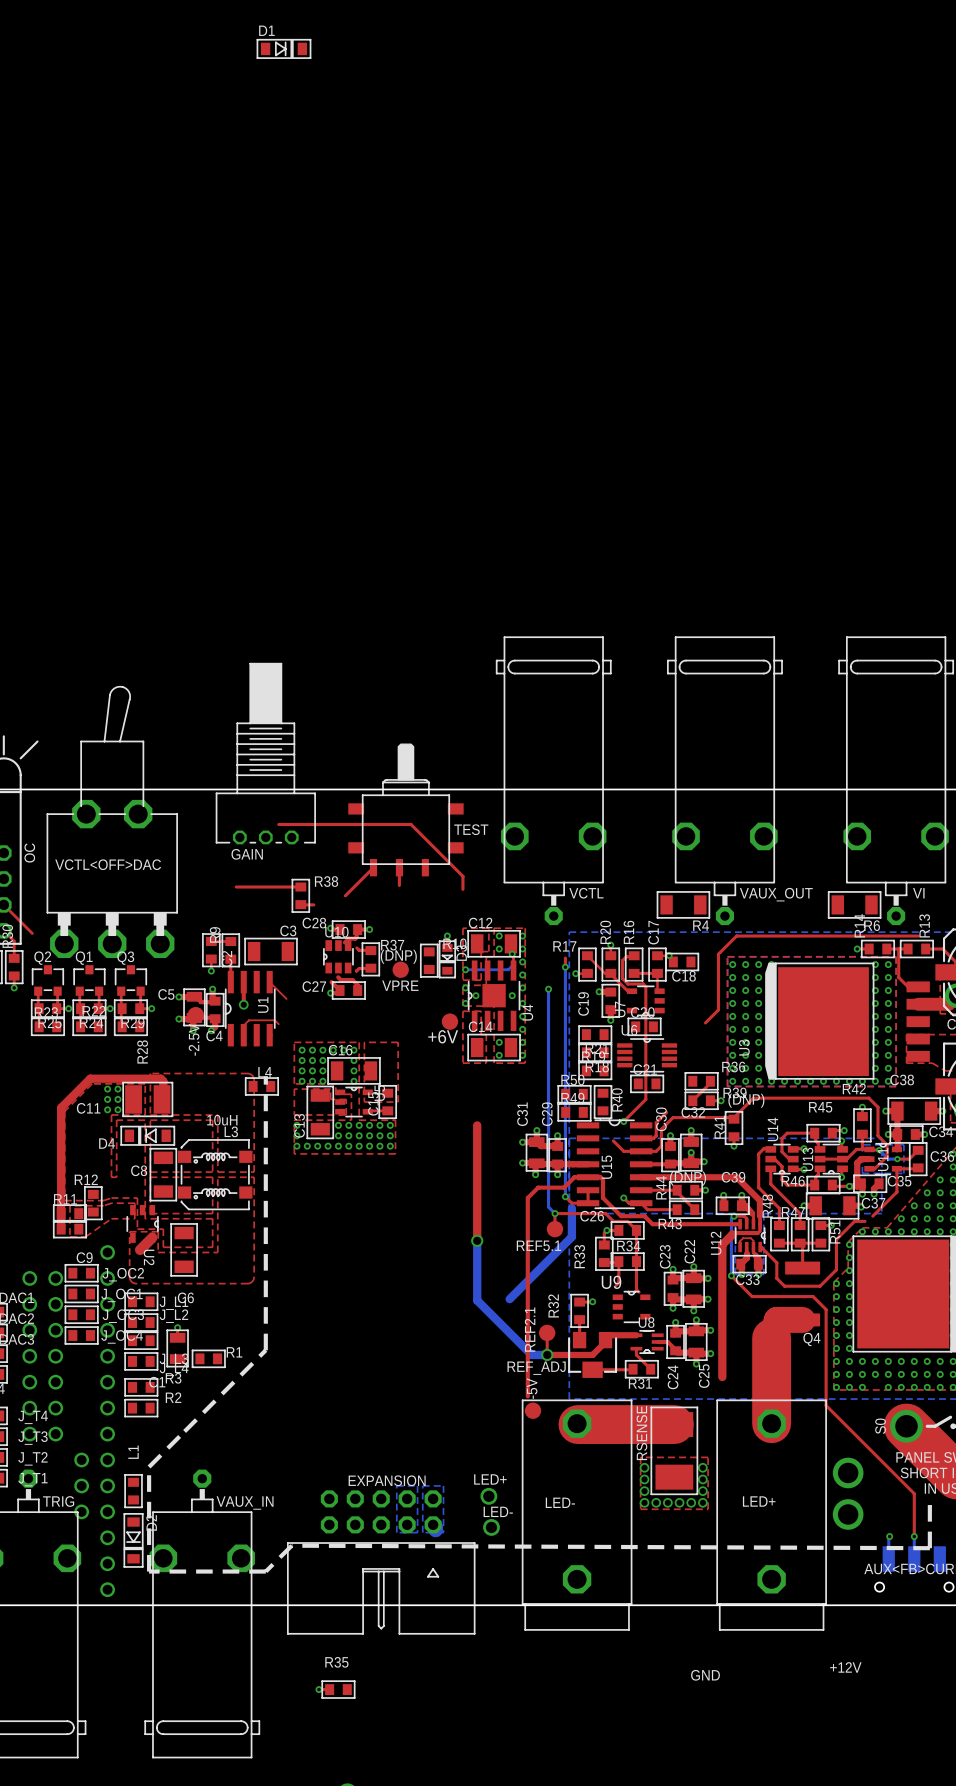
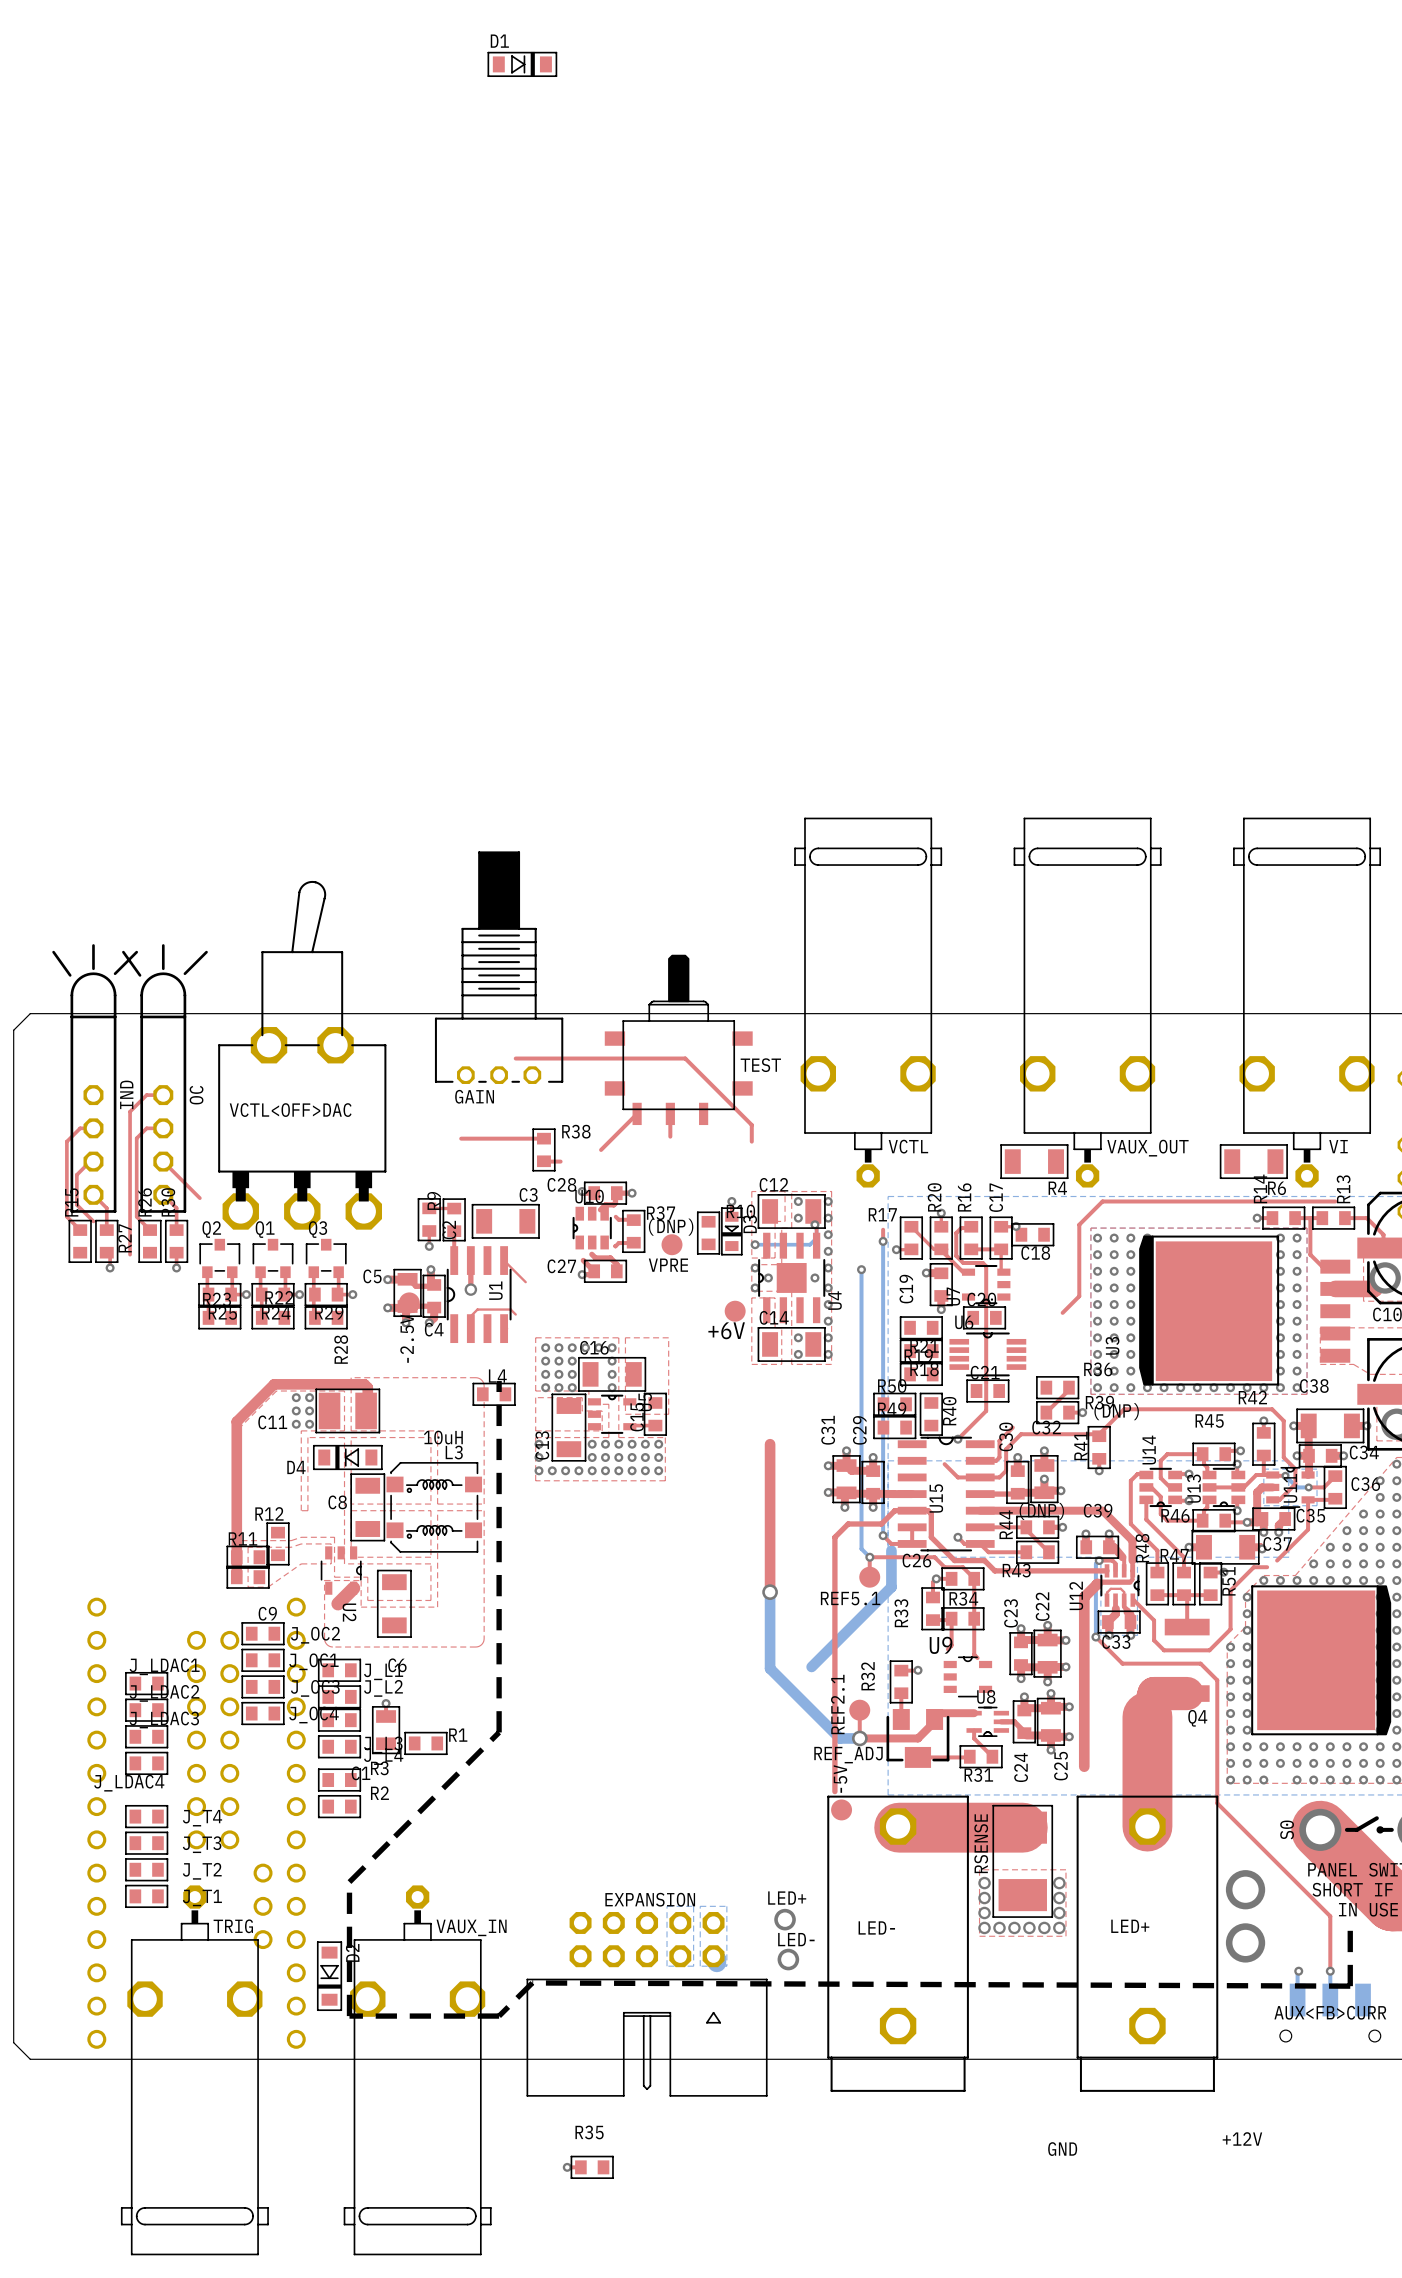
L1: (133, 1491) -> none

